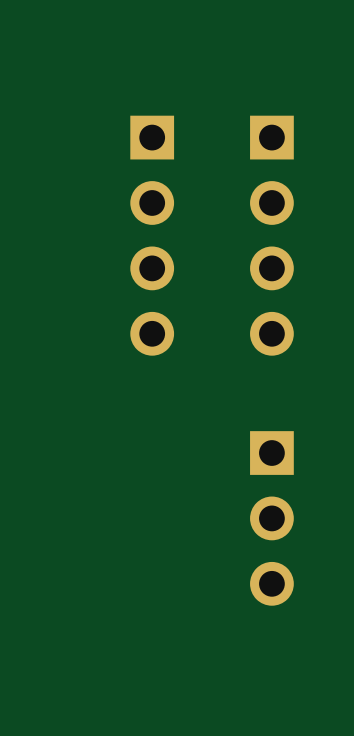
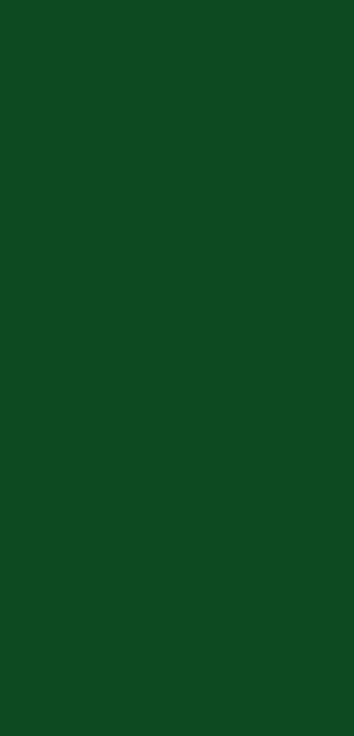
part: (152, 235) -> none
part: (271, 235) -> none
part: (271, 518) -> none

